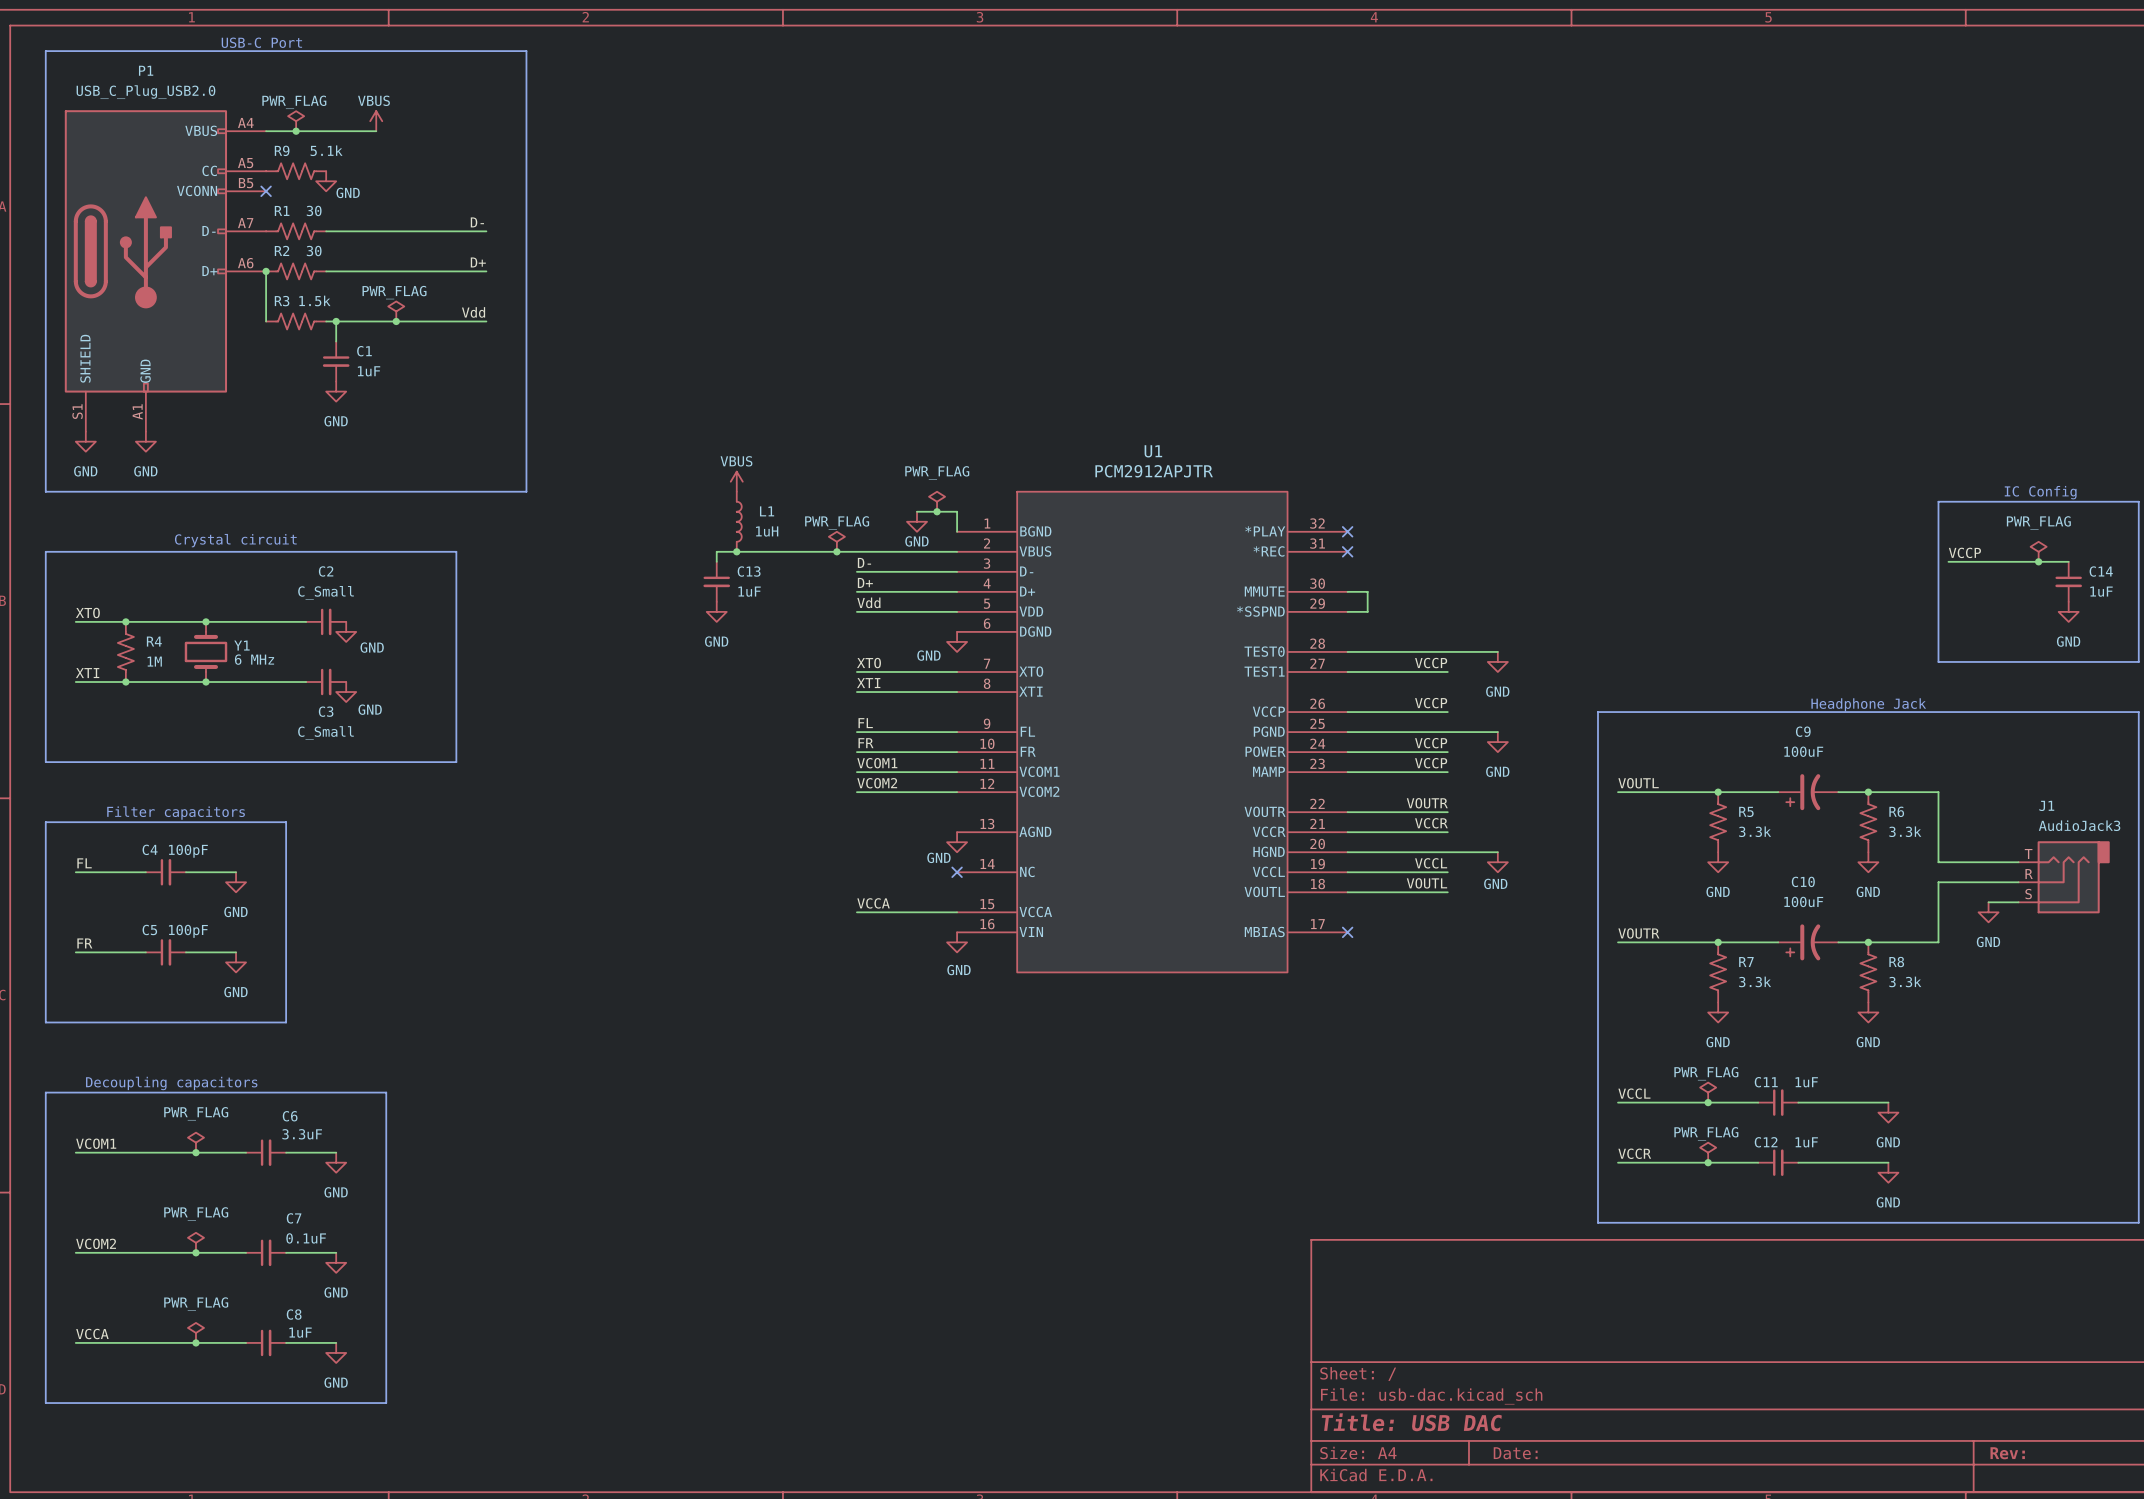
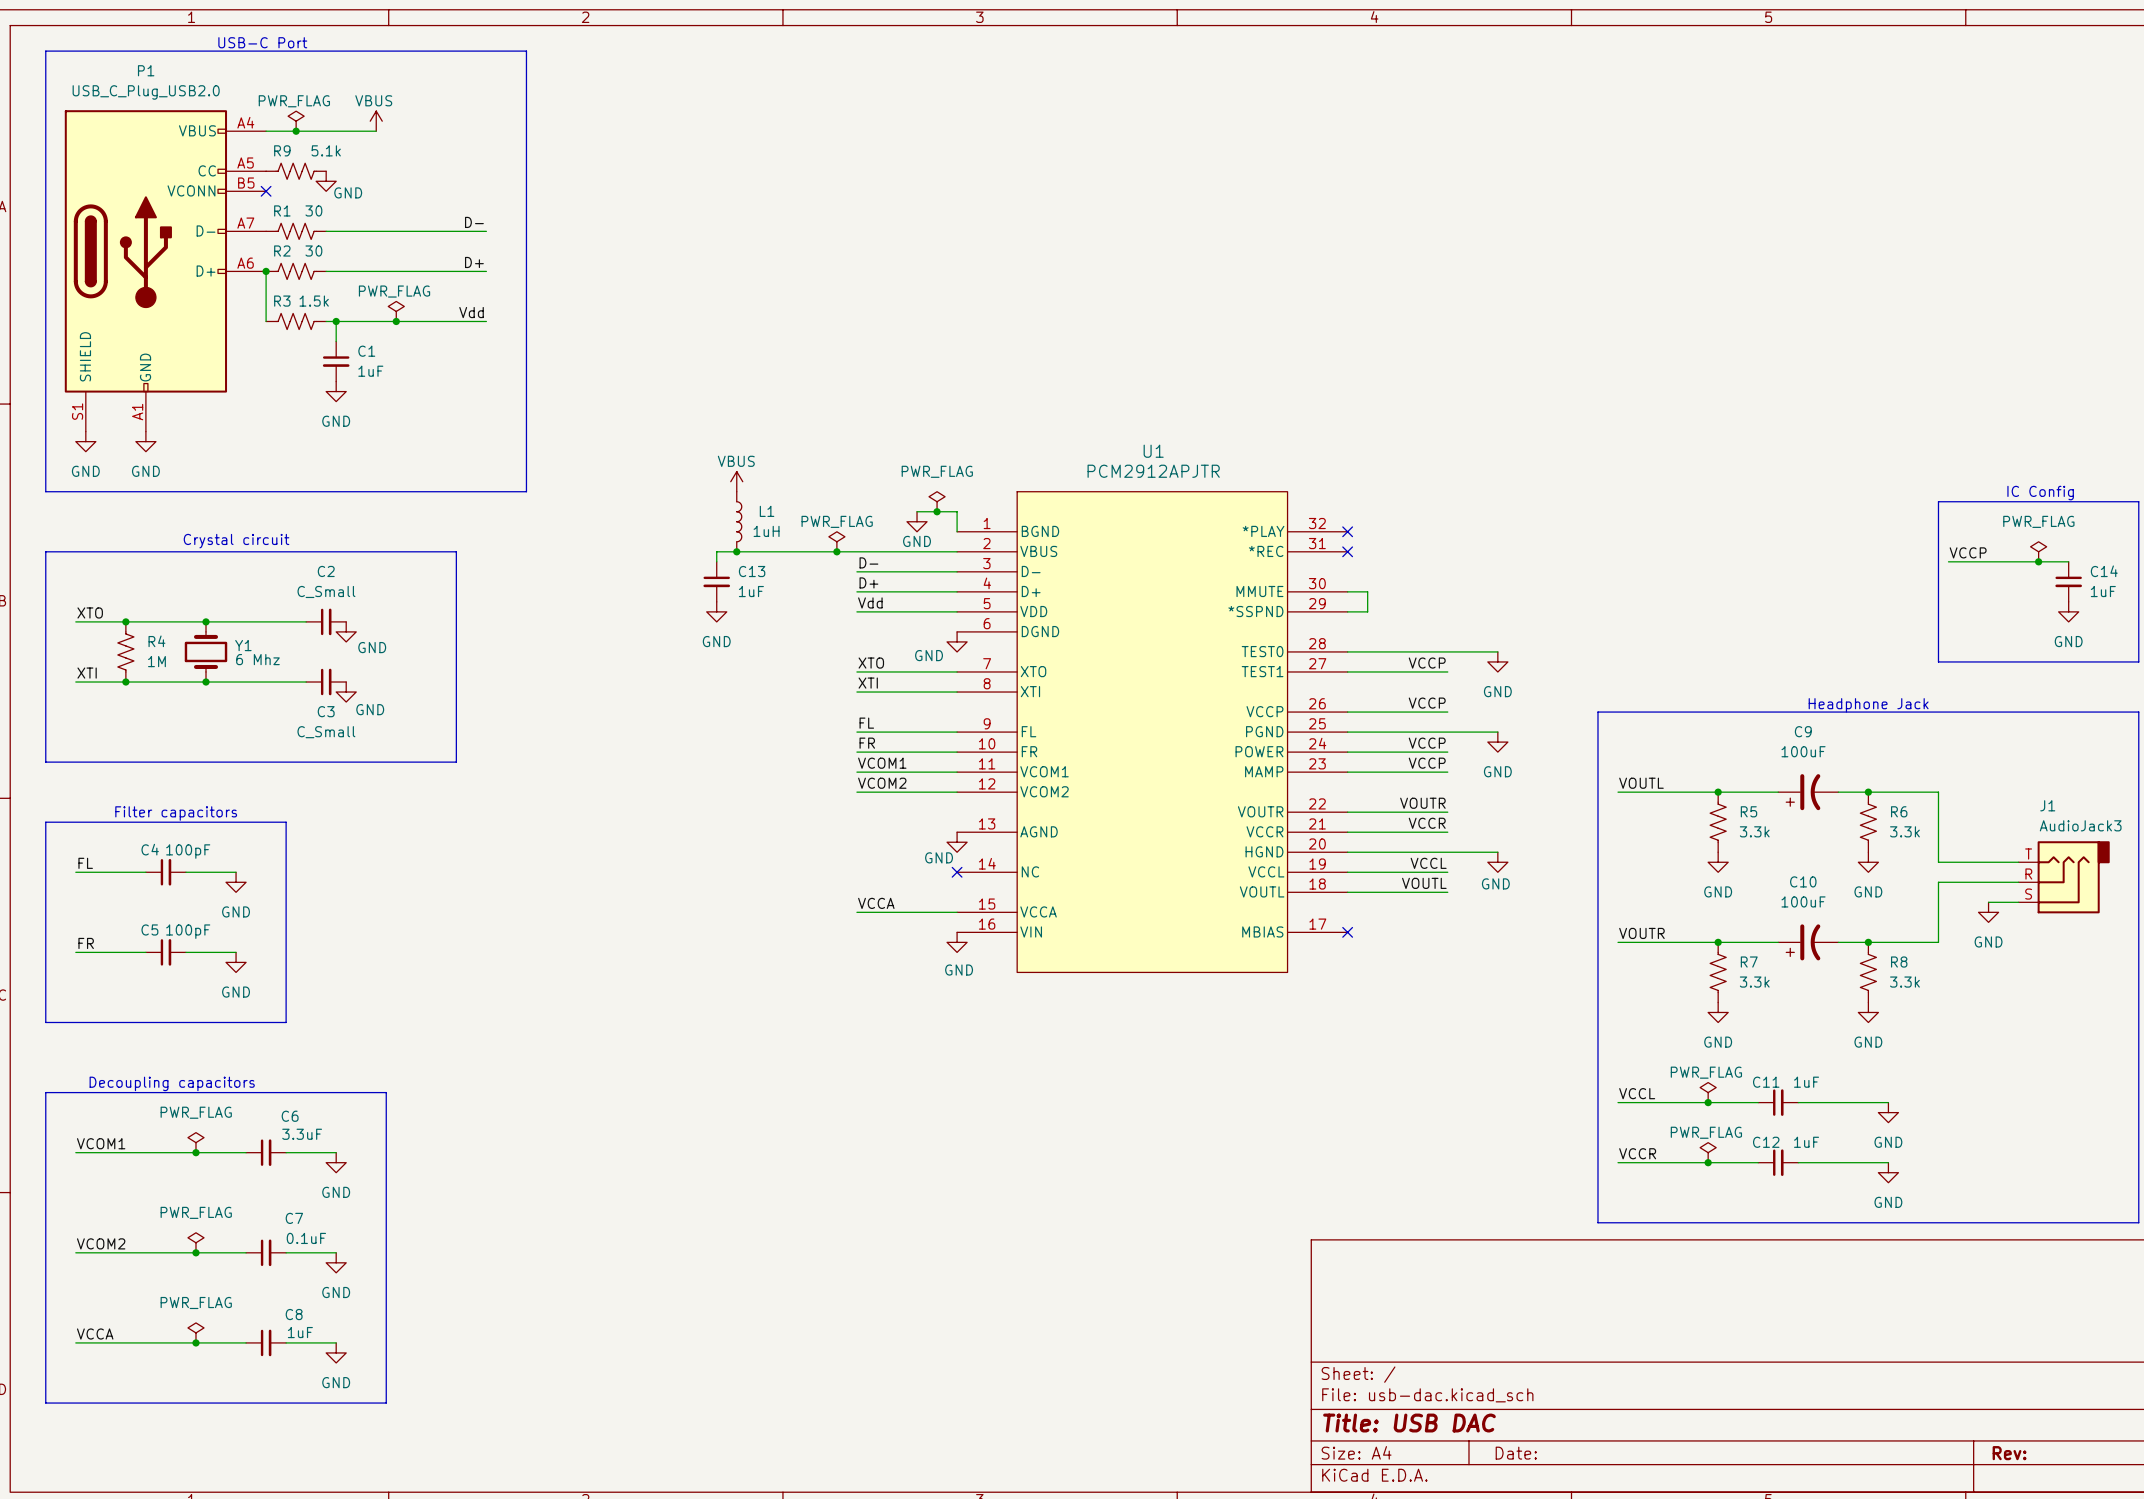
Y1 value: 6 MHz (254, 659) -> 6 Mhz (257, 659)

